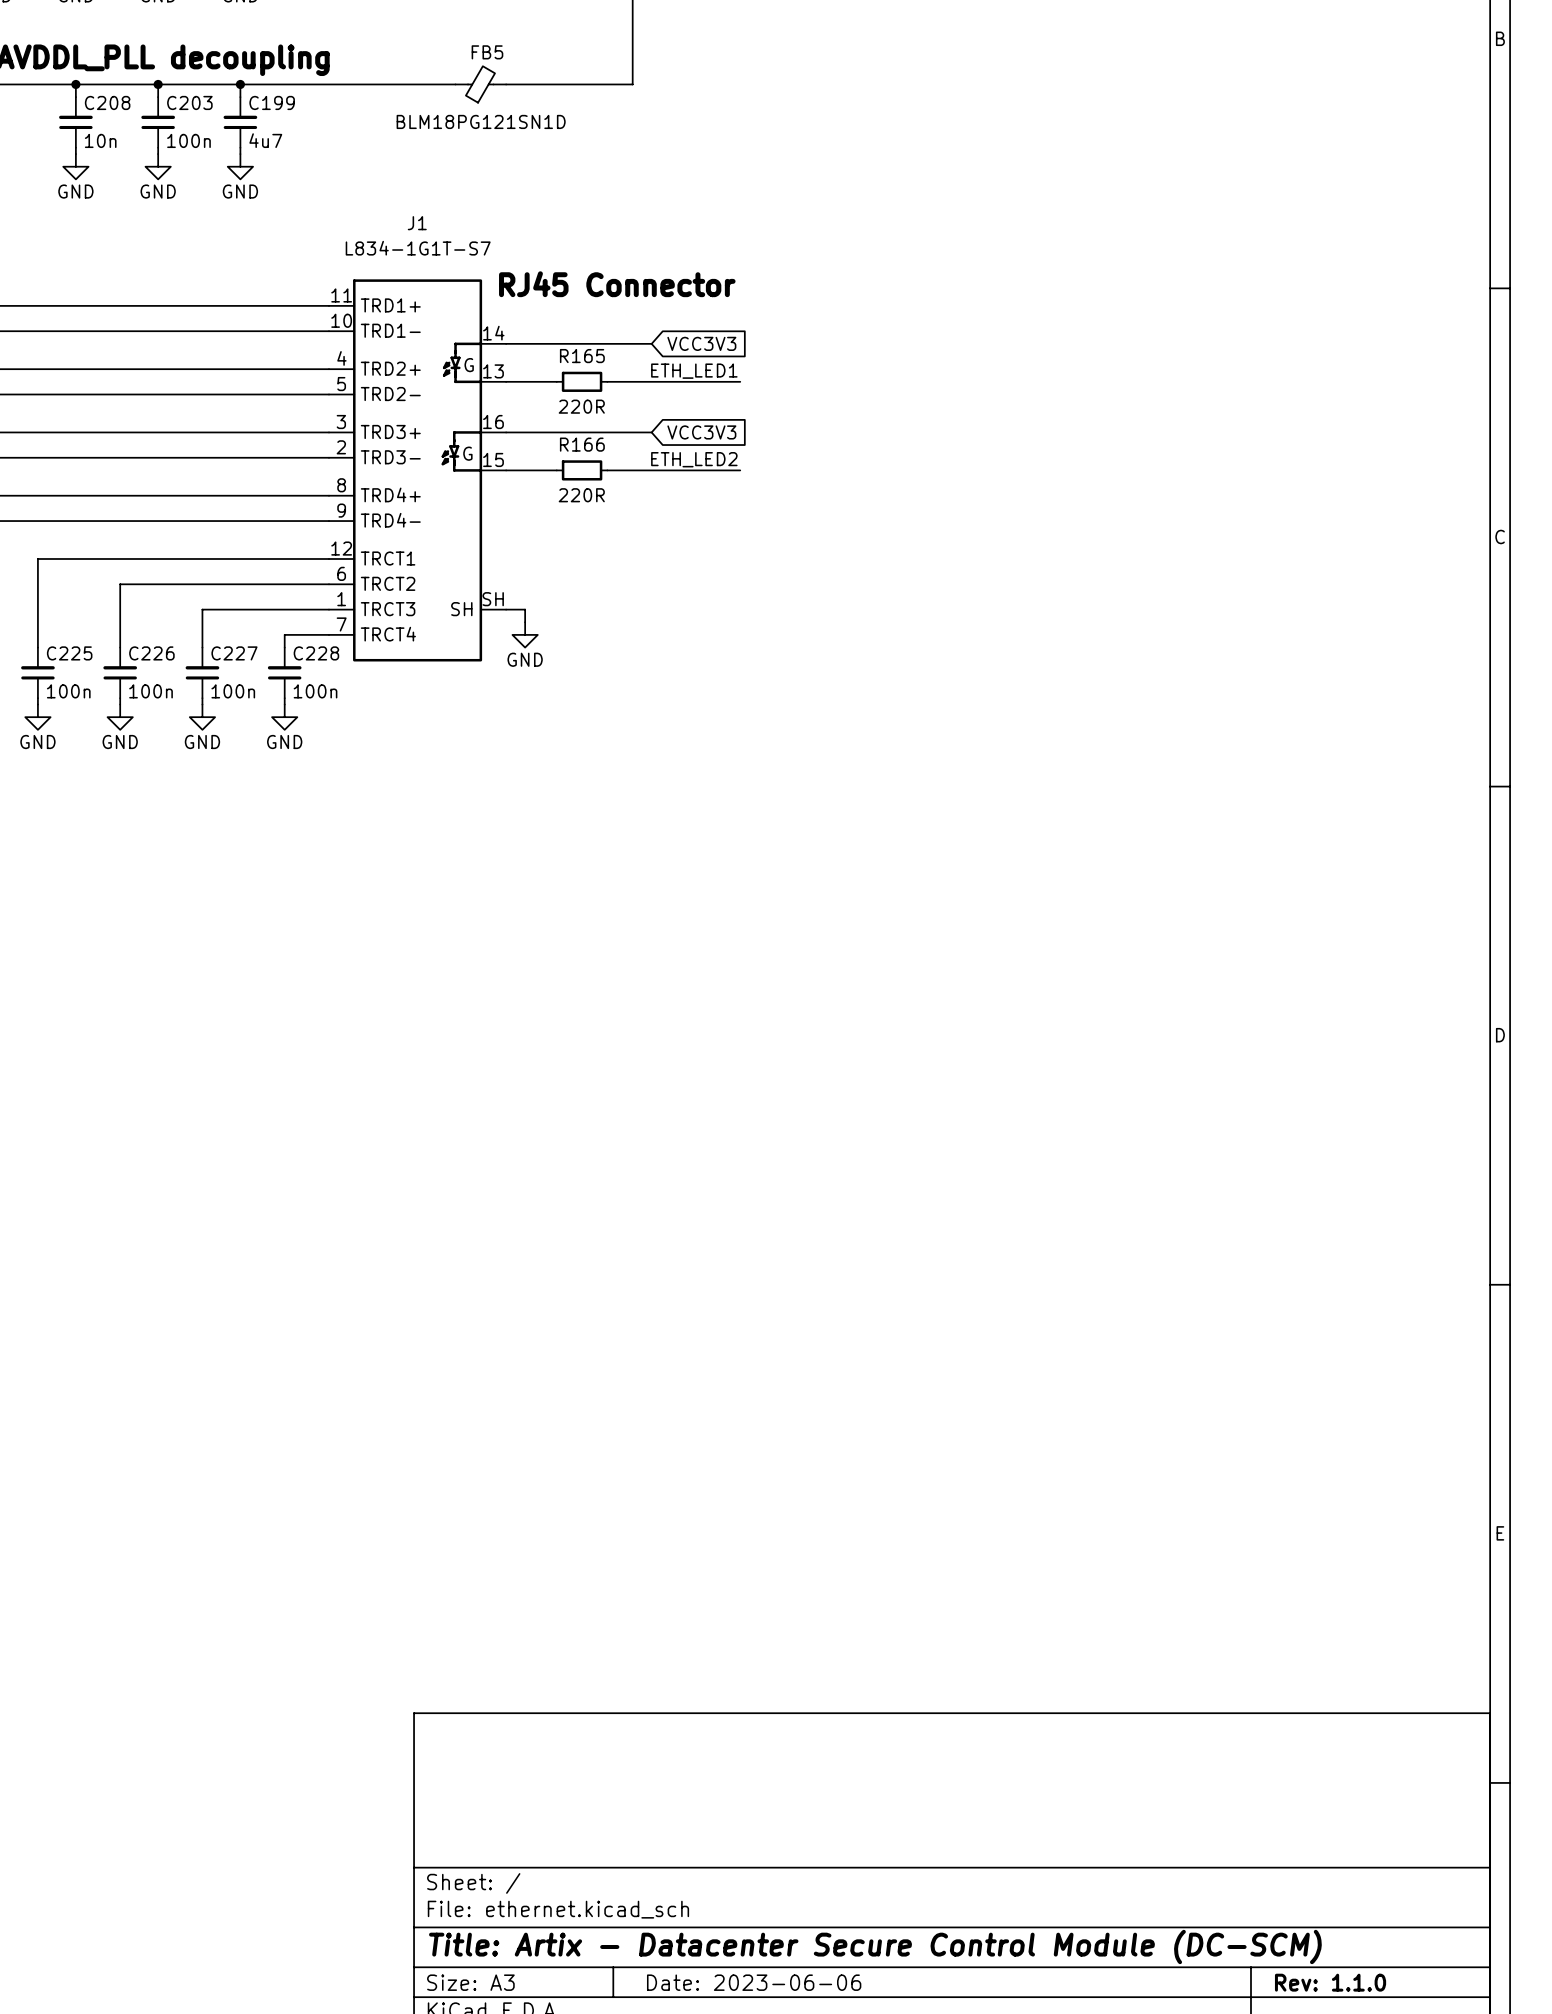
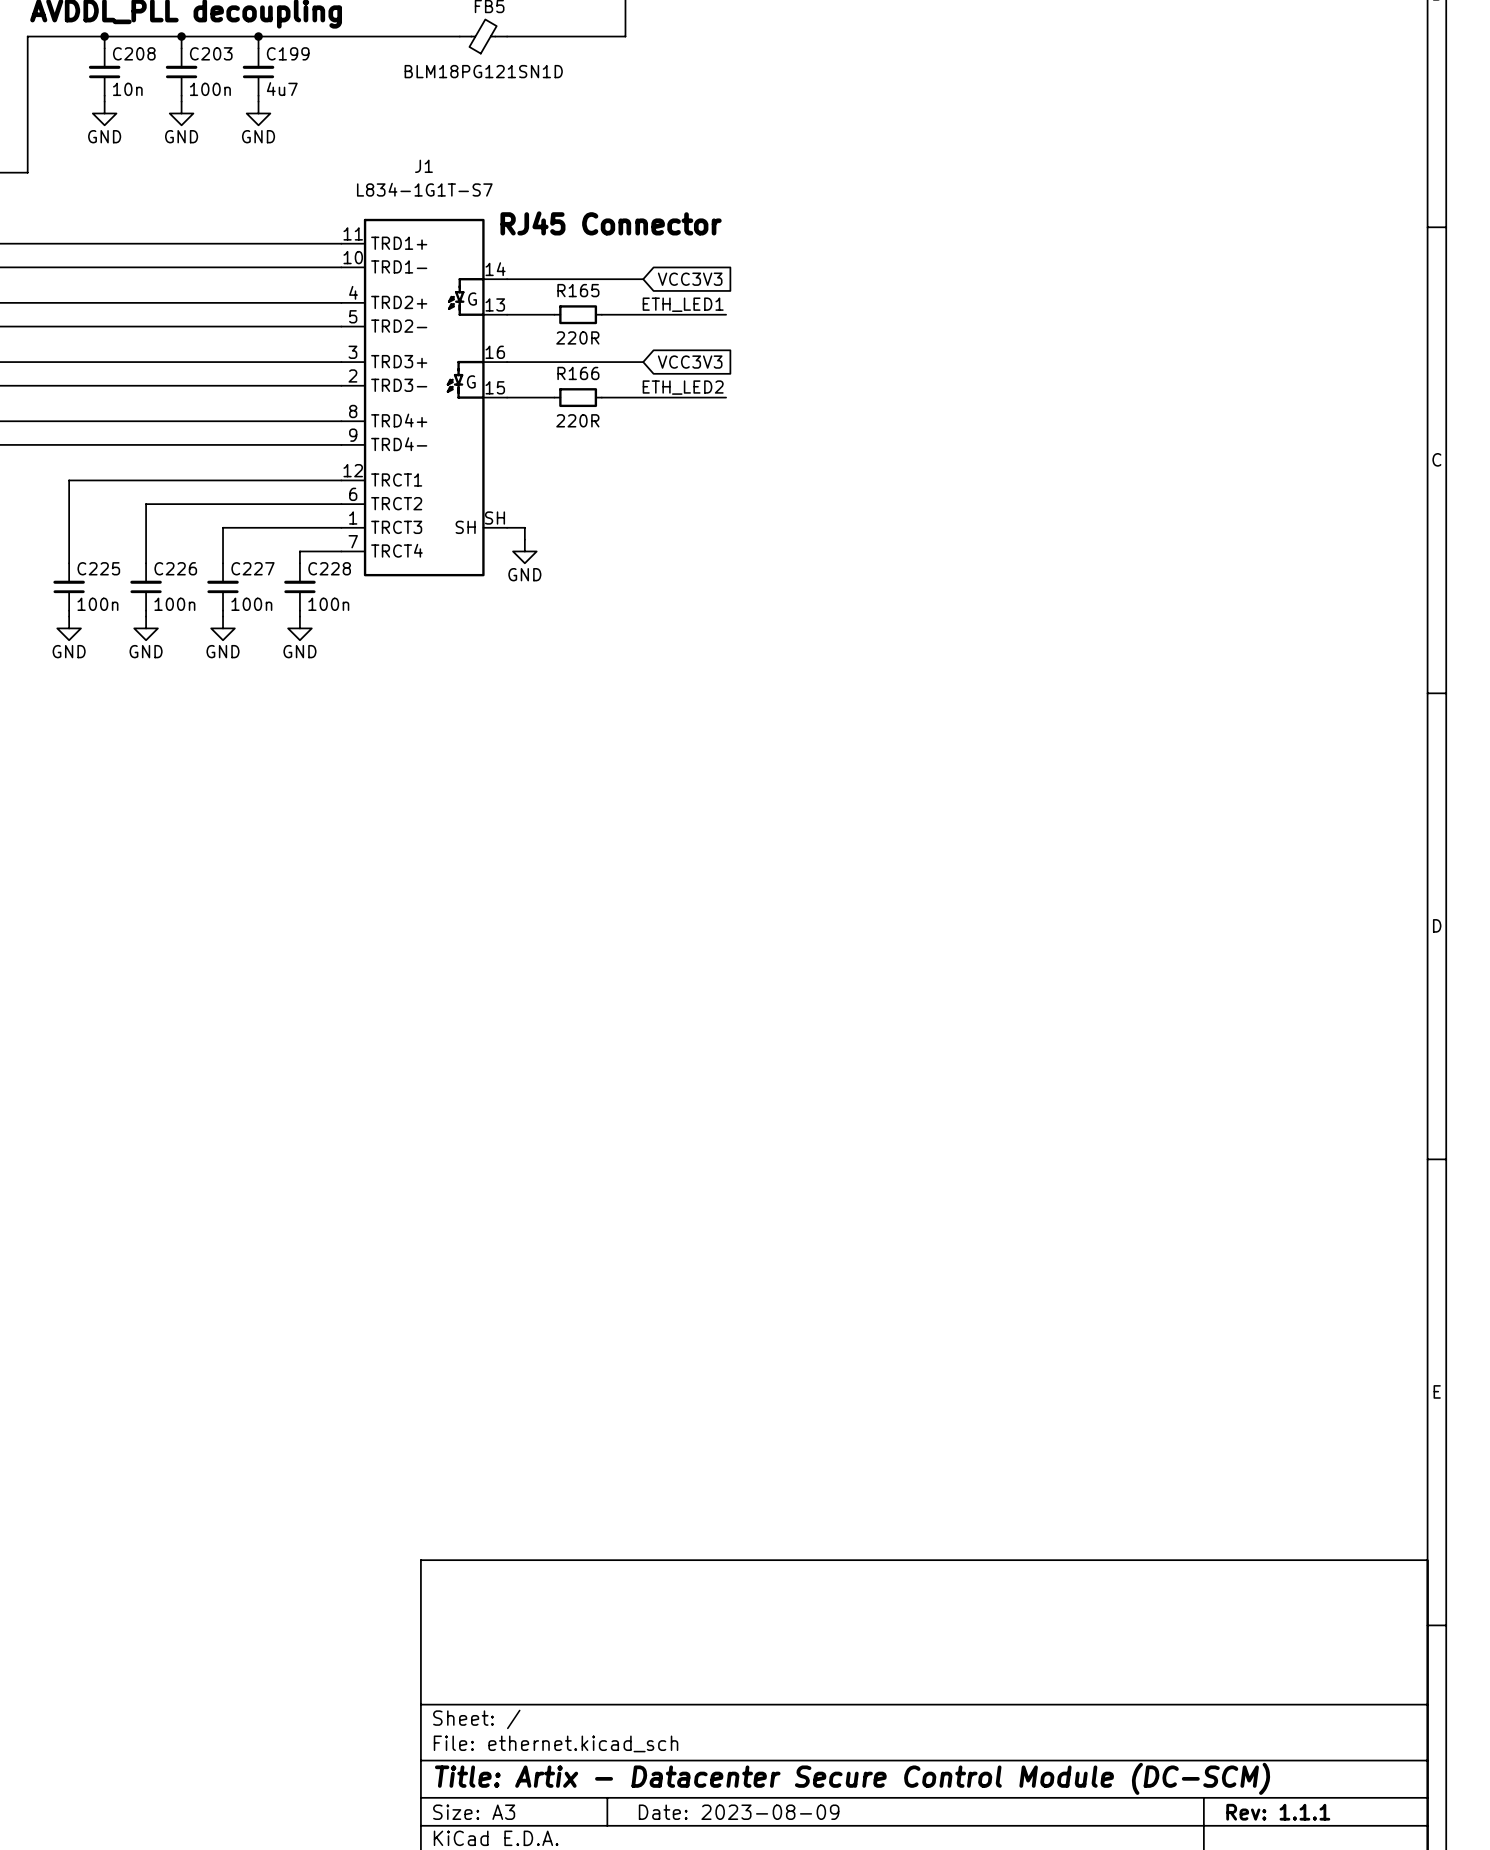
title block: Date: 2023-06-06 (754, 1982) -> Date: 2023-08-09 (739, 1812)
title block: Rev: 1.1.0 (1330, 1982) -> Rev: 1.1.1 (1278, 1812)

